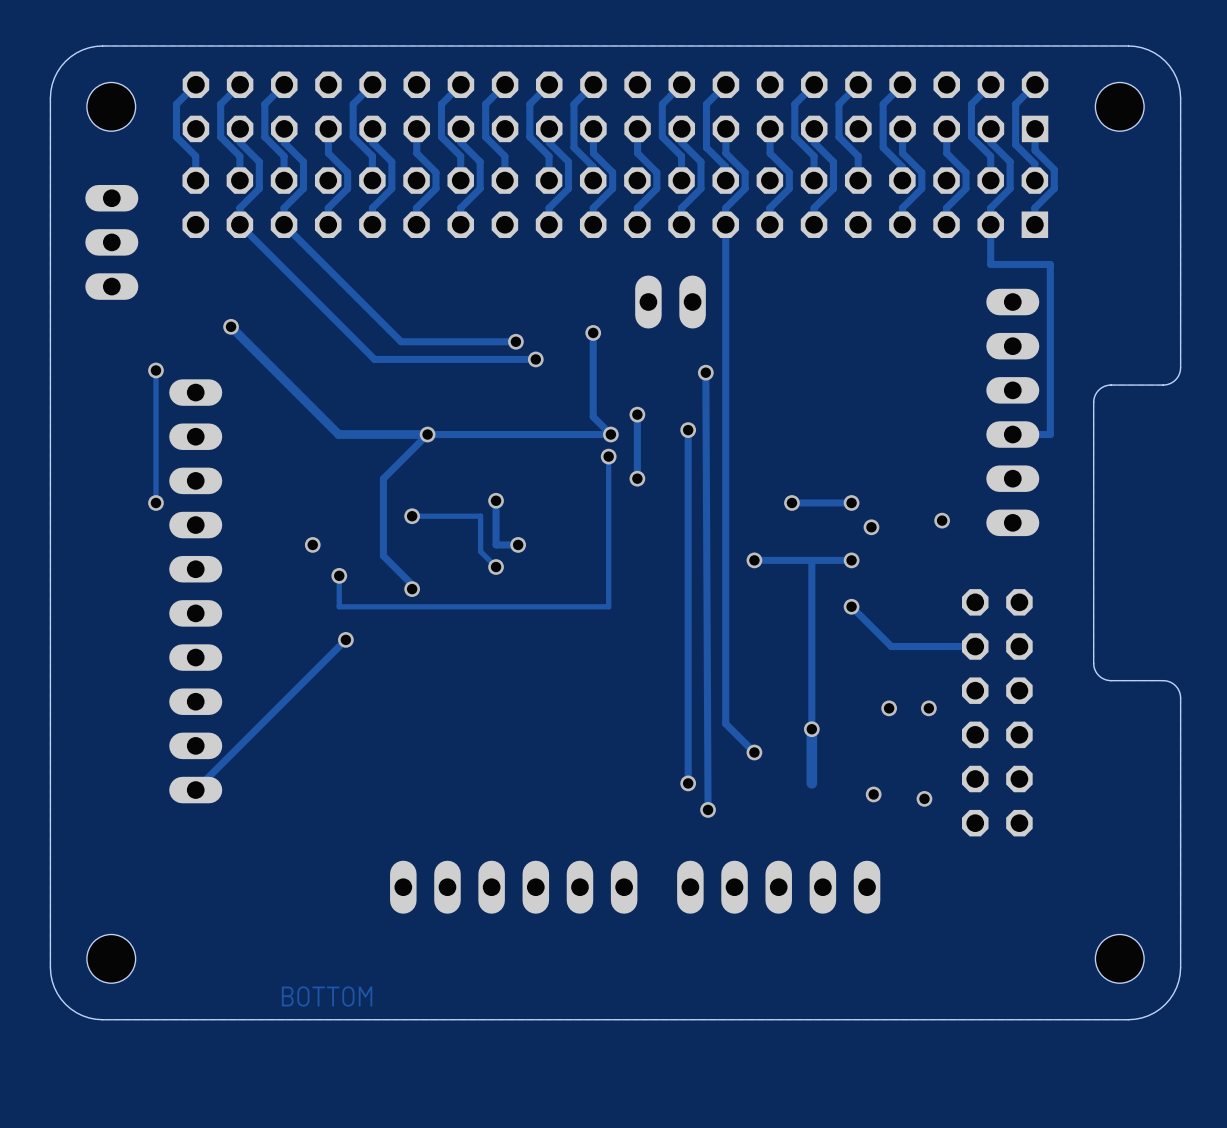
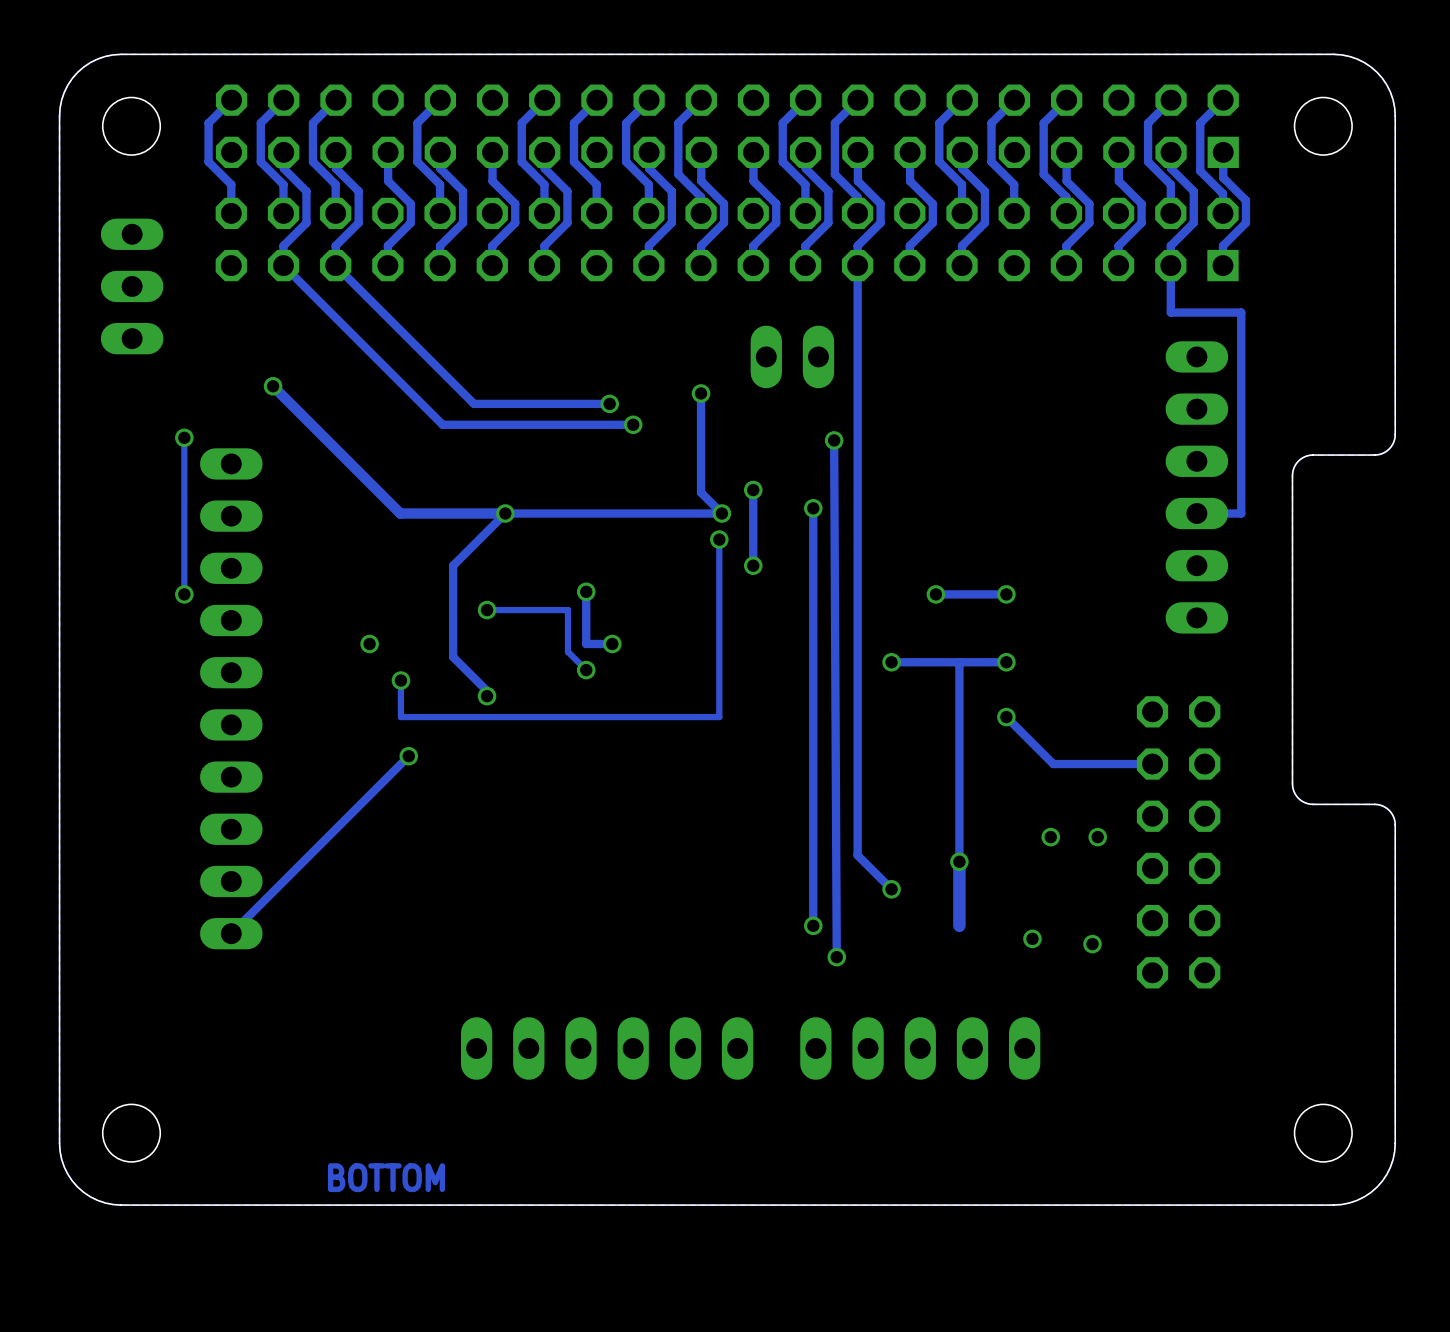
via: (942, 520) -> none
via: (871, 527) -> none

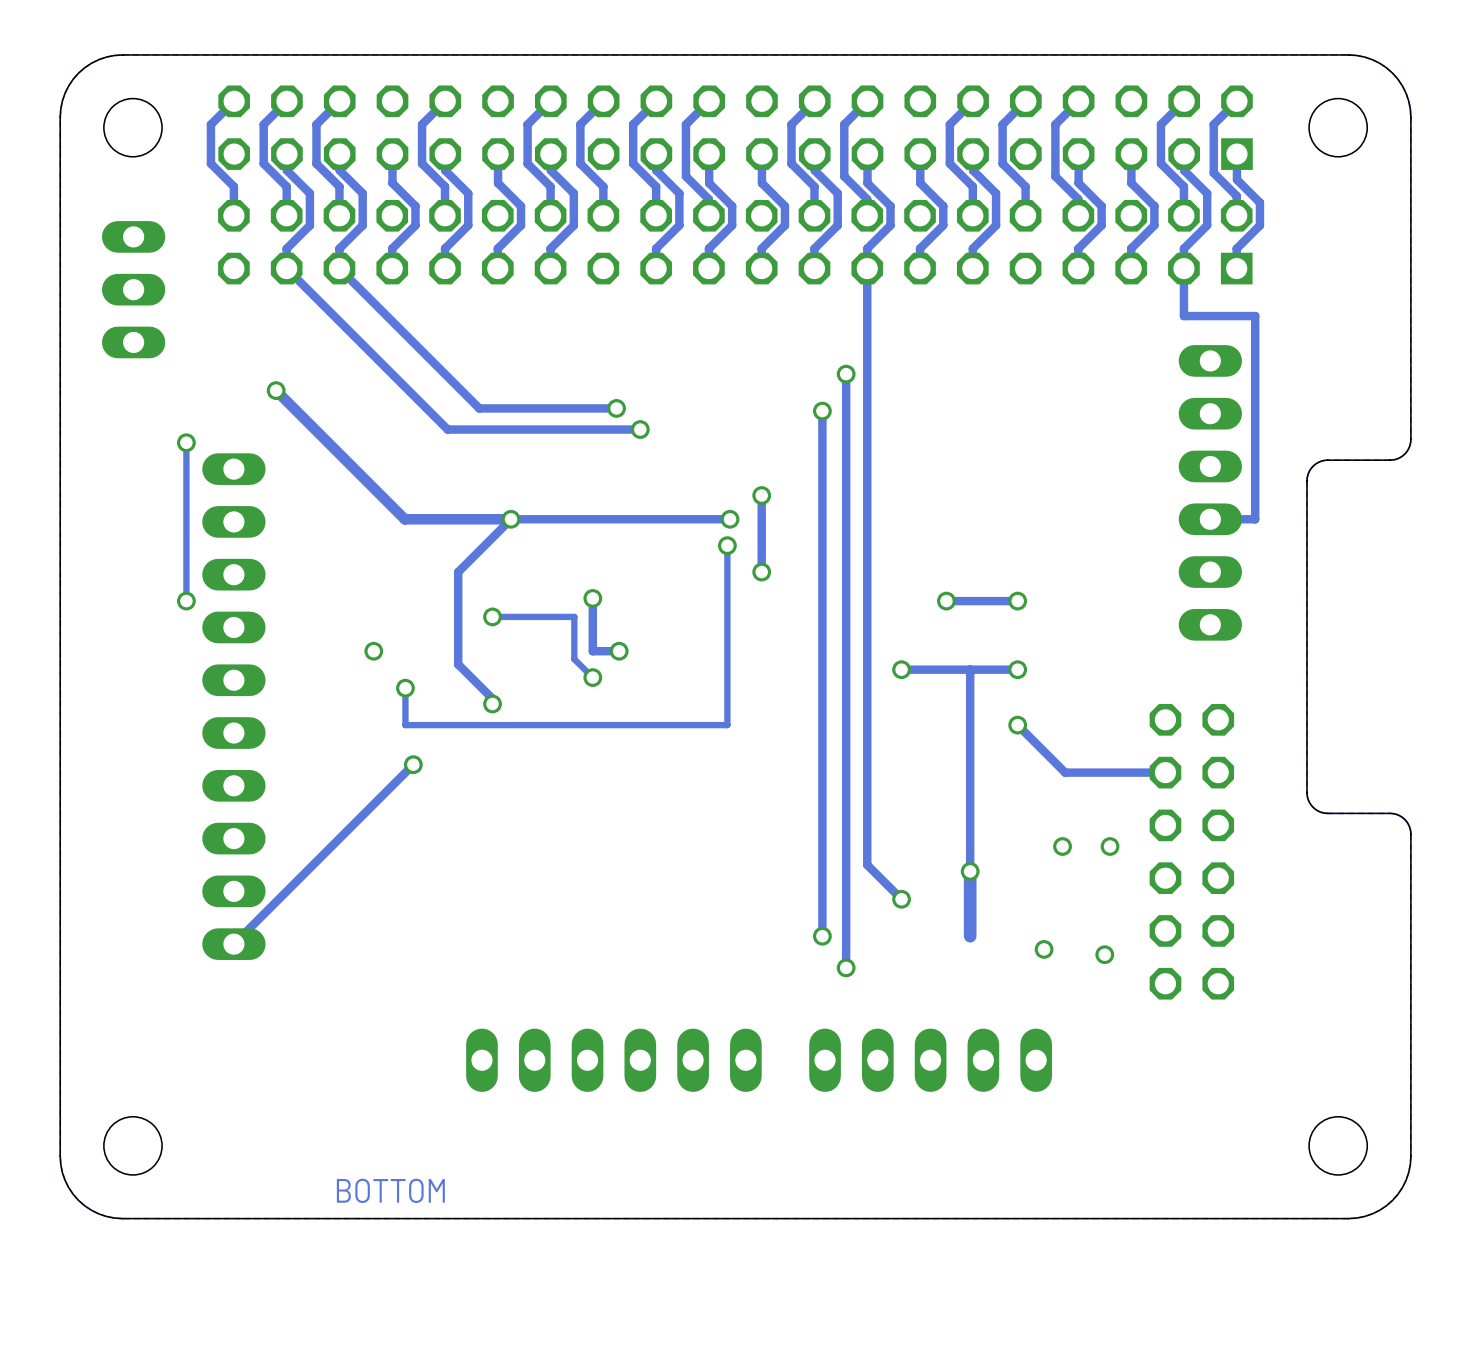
part: (792, 356) -> none
via: none -> (846, 374)
track: (701, 393) (701, 492) (721, 513) -> none
via: (701, 393) -> none
track: none -> (822, 411) (822, 513)
via: none -> (822, 411)
track: (834, 440) (836, 957) -> (846, 374) (846, 967)
via: (834, 440) -> none
via: (813, 508) -> none

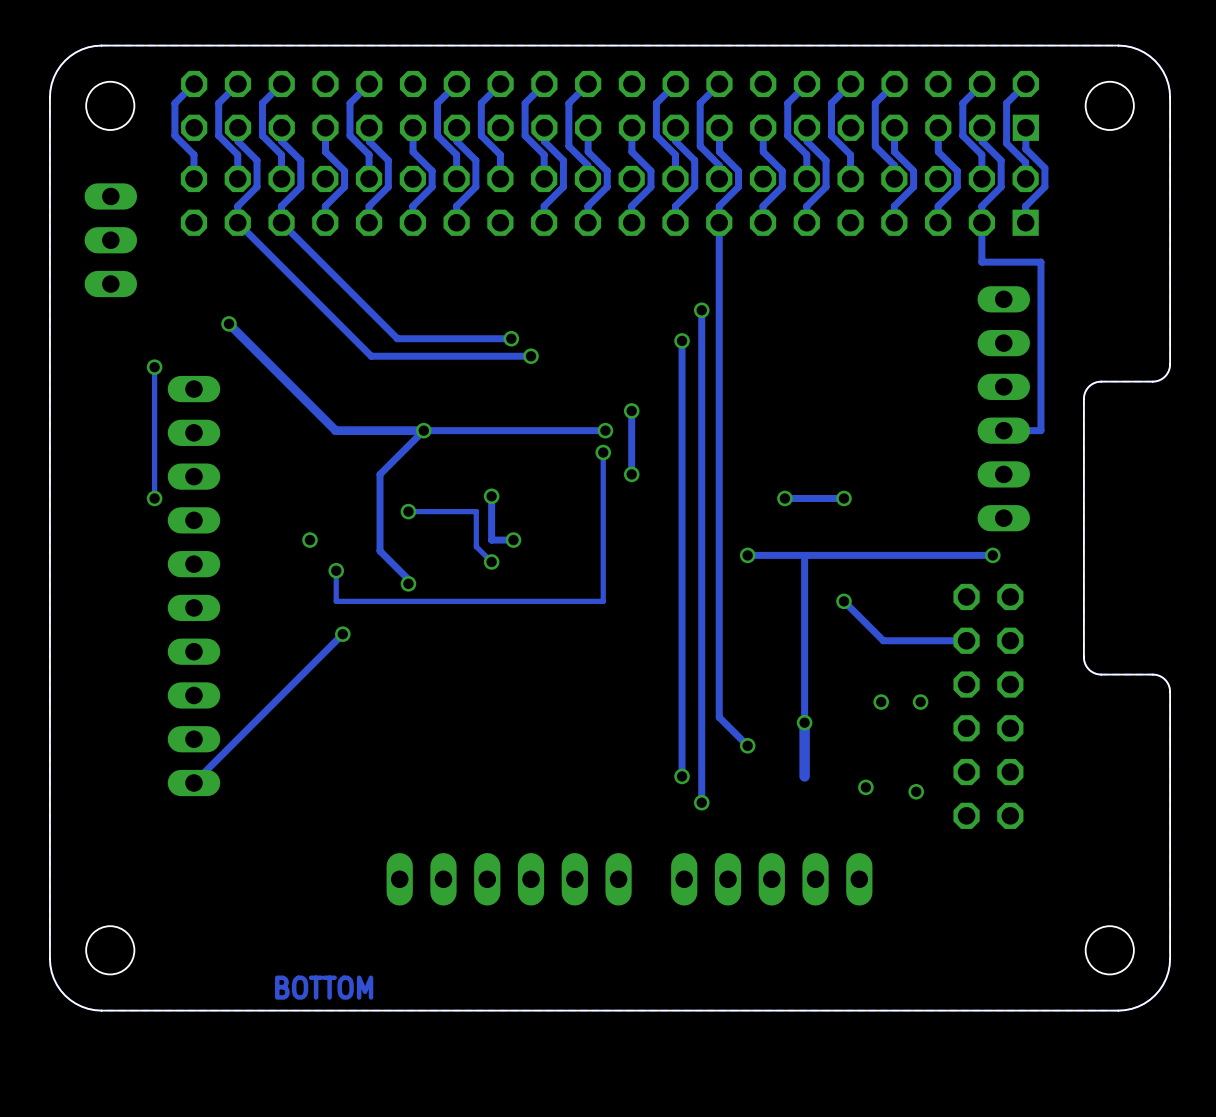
via: (1017, 669) -> none
track: none -> (992, 555) (843, 555)
via: none -> (992, 555)

